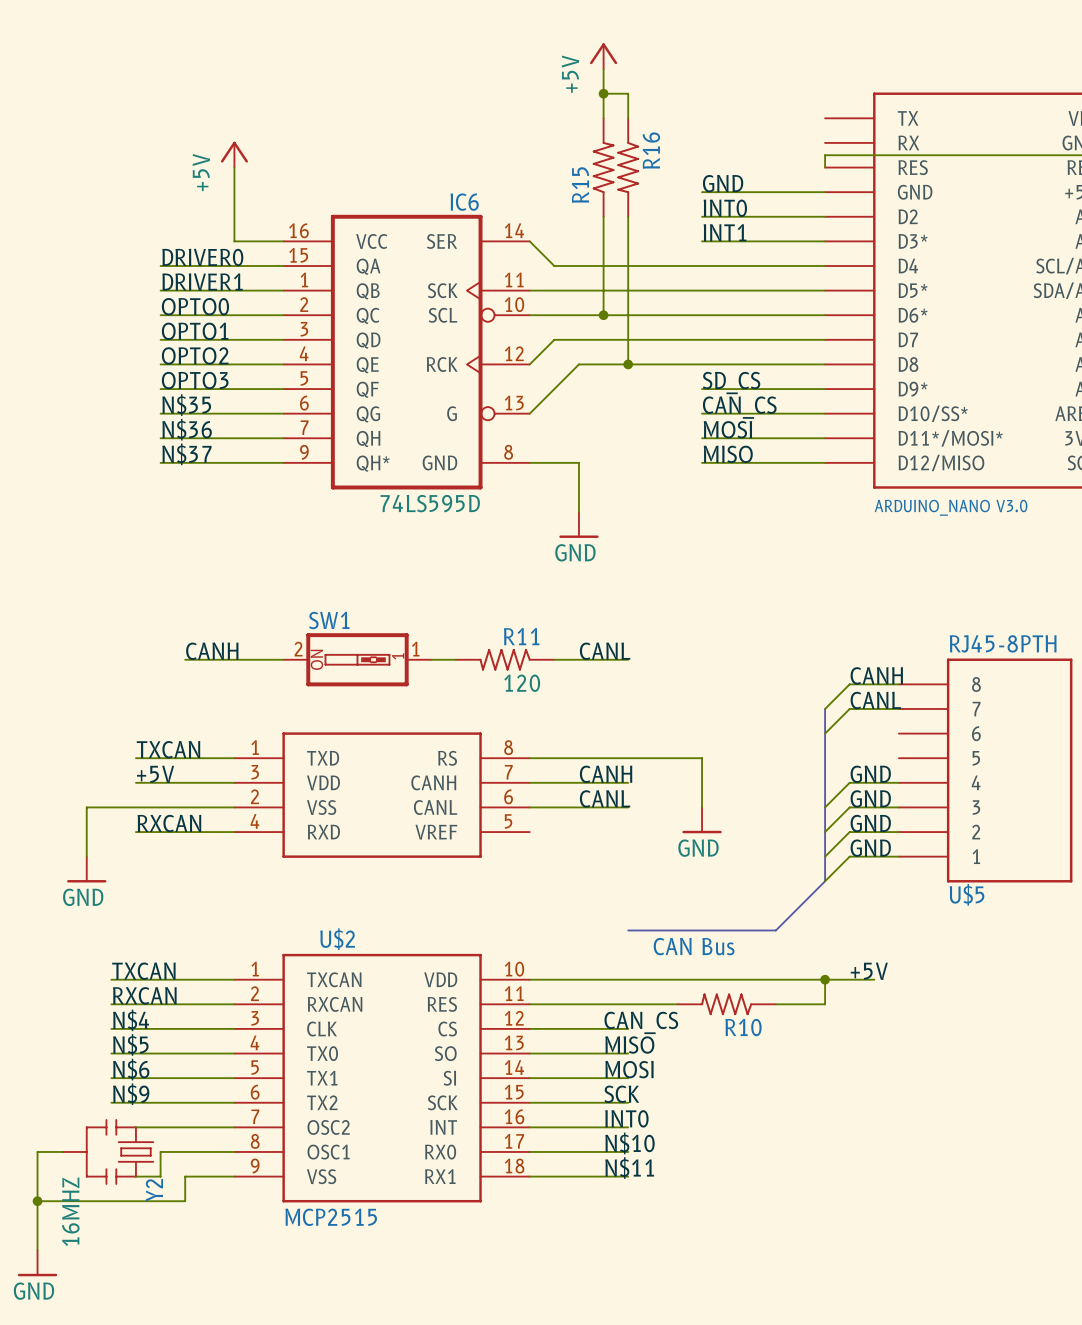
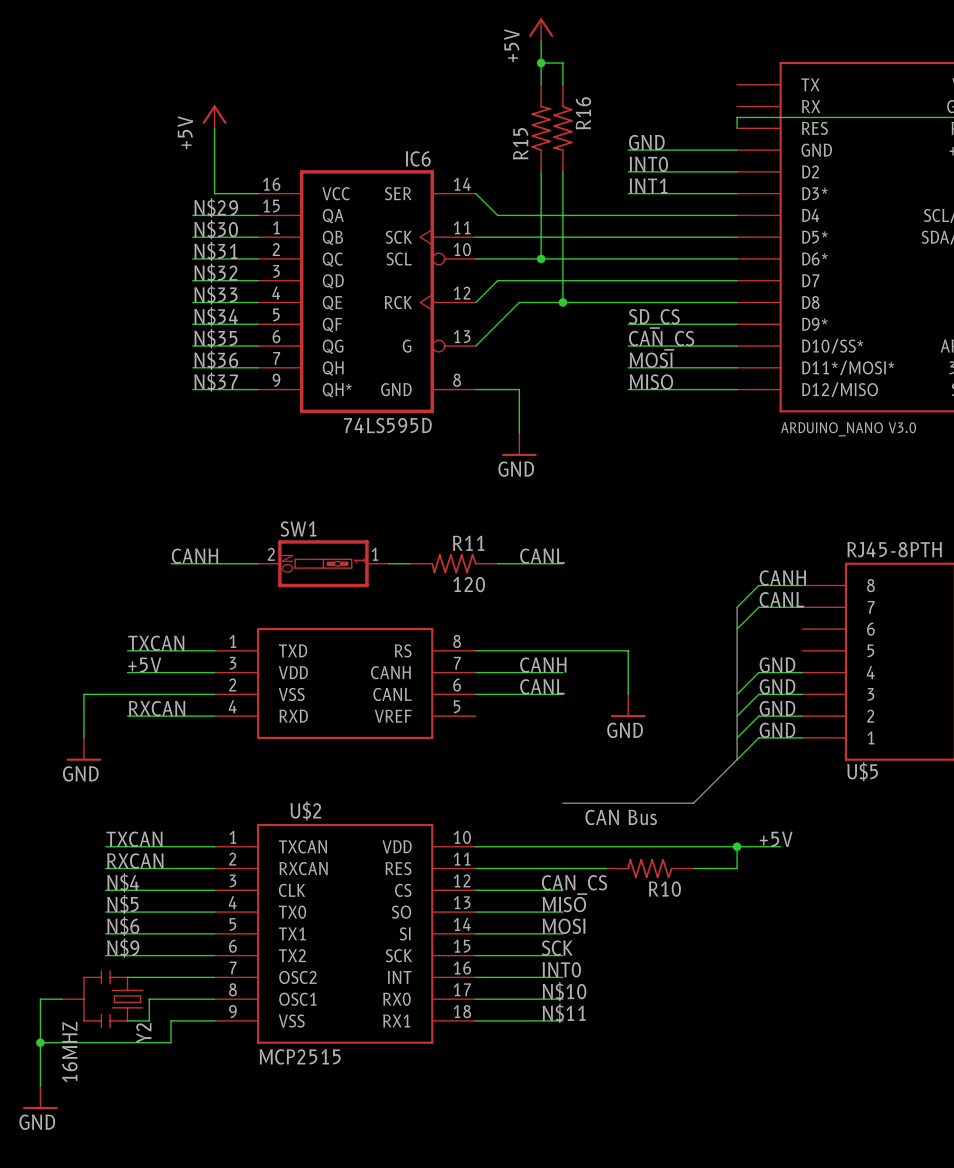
label: DRIVER0 (202, 257) -> none
label: none -> N$29 (216, 207)
wire: (160, 265) (209, 265) -> none
label: none -> N$30 (216, 229)
label: DRIVER1 (202, 282) -> none
wire: (160, 290) (209, 290) -> none
label: OPTO0 (195, 306) -> none
label: none -> N$31 (215, 251)
wire: (160, 315) (209, 315) -> none
label: OPTO1 (195, 331) -> none
label: none -> N$32 (215, 273)
wire: (160, 339) (209, 339) -> none
label: OPTO2 (195, 355) -> none
label: none -> N$33 (215, 294)
wire: (160, 364) (209, 364) -> none
label: OPTO3 (195, 380) -> none
label: none -> N$34 (216, 316)
wire: (160, 389) (209, 389) -> none
label position: N$35 (186, 405) -> N$35 (215, 338)
wire: (160, 413) (209, 413) -> none
label position: N$36 (187, 429) -> N$36 (216, 360)
wire: (160, 438) (209, 438) -> none
label position: N$37 (186, 454) -> N$37 (216, 381)
wire: (160, 462) (209, 462) -> none

